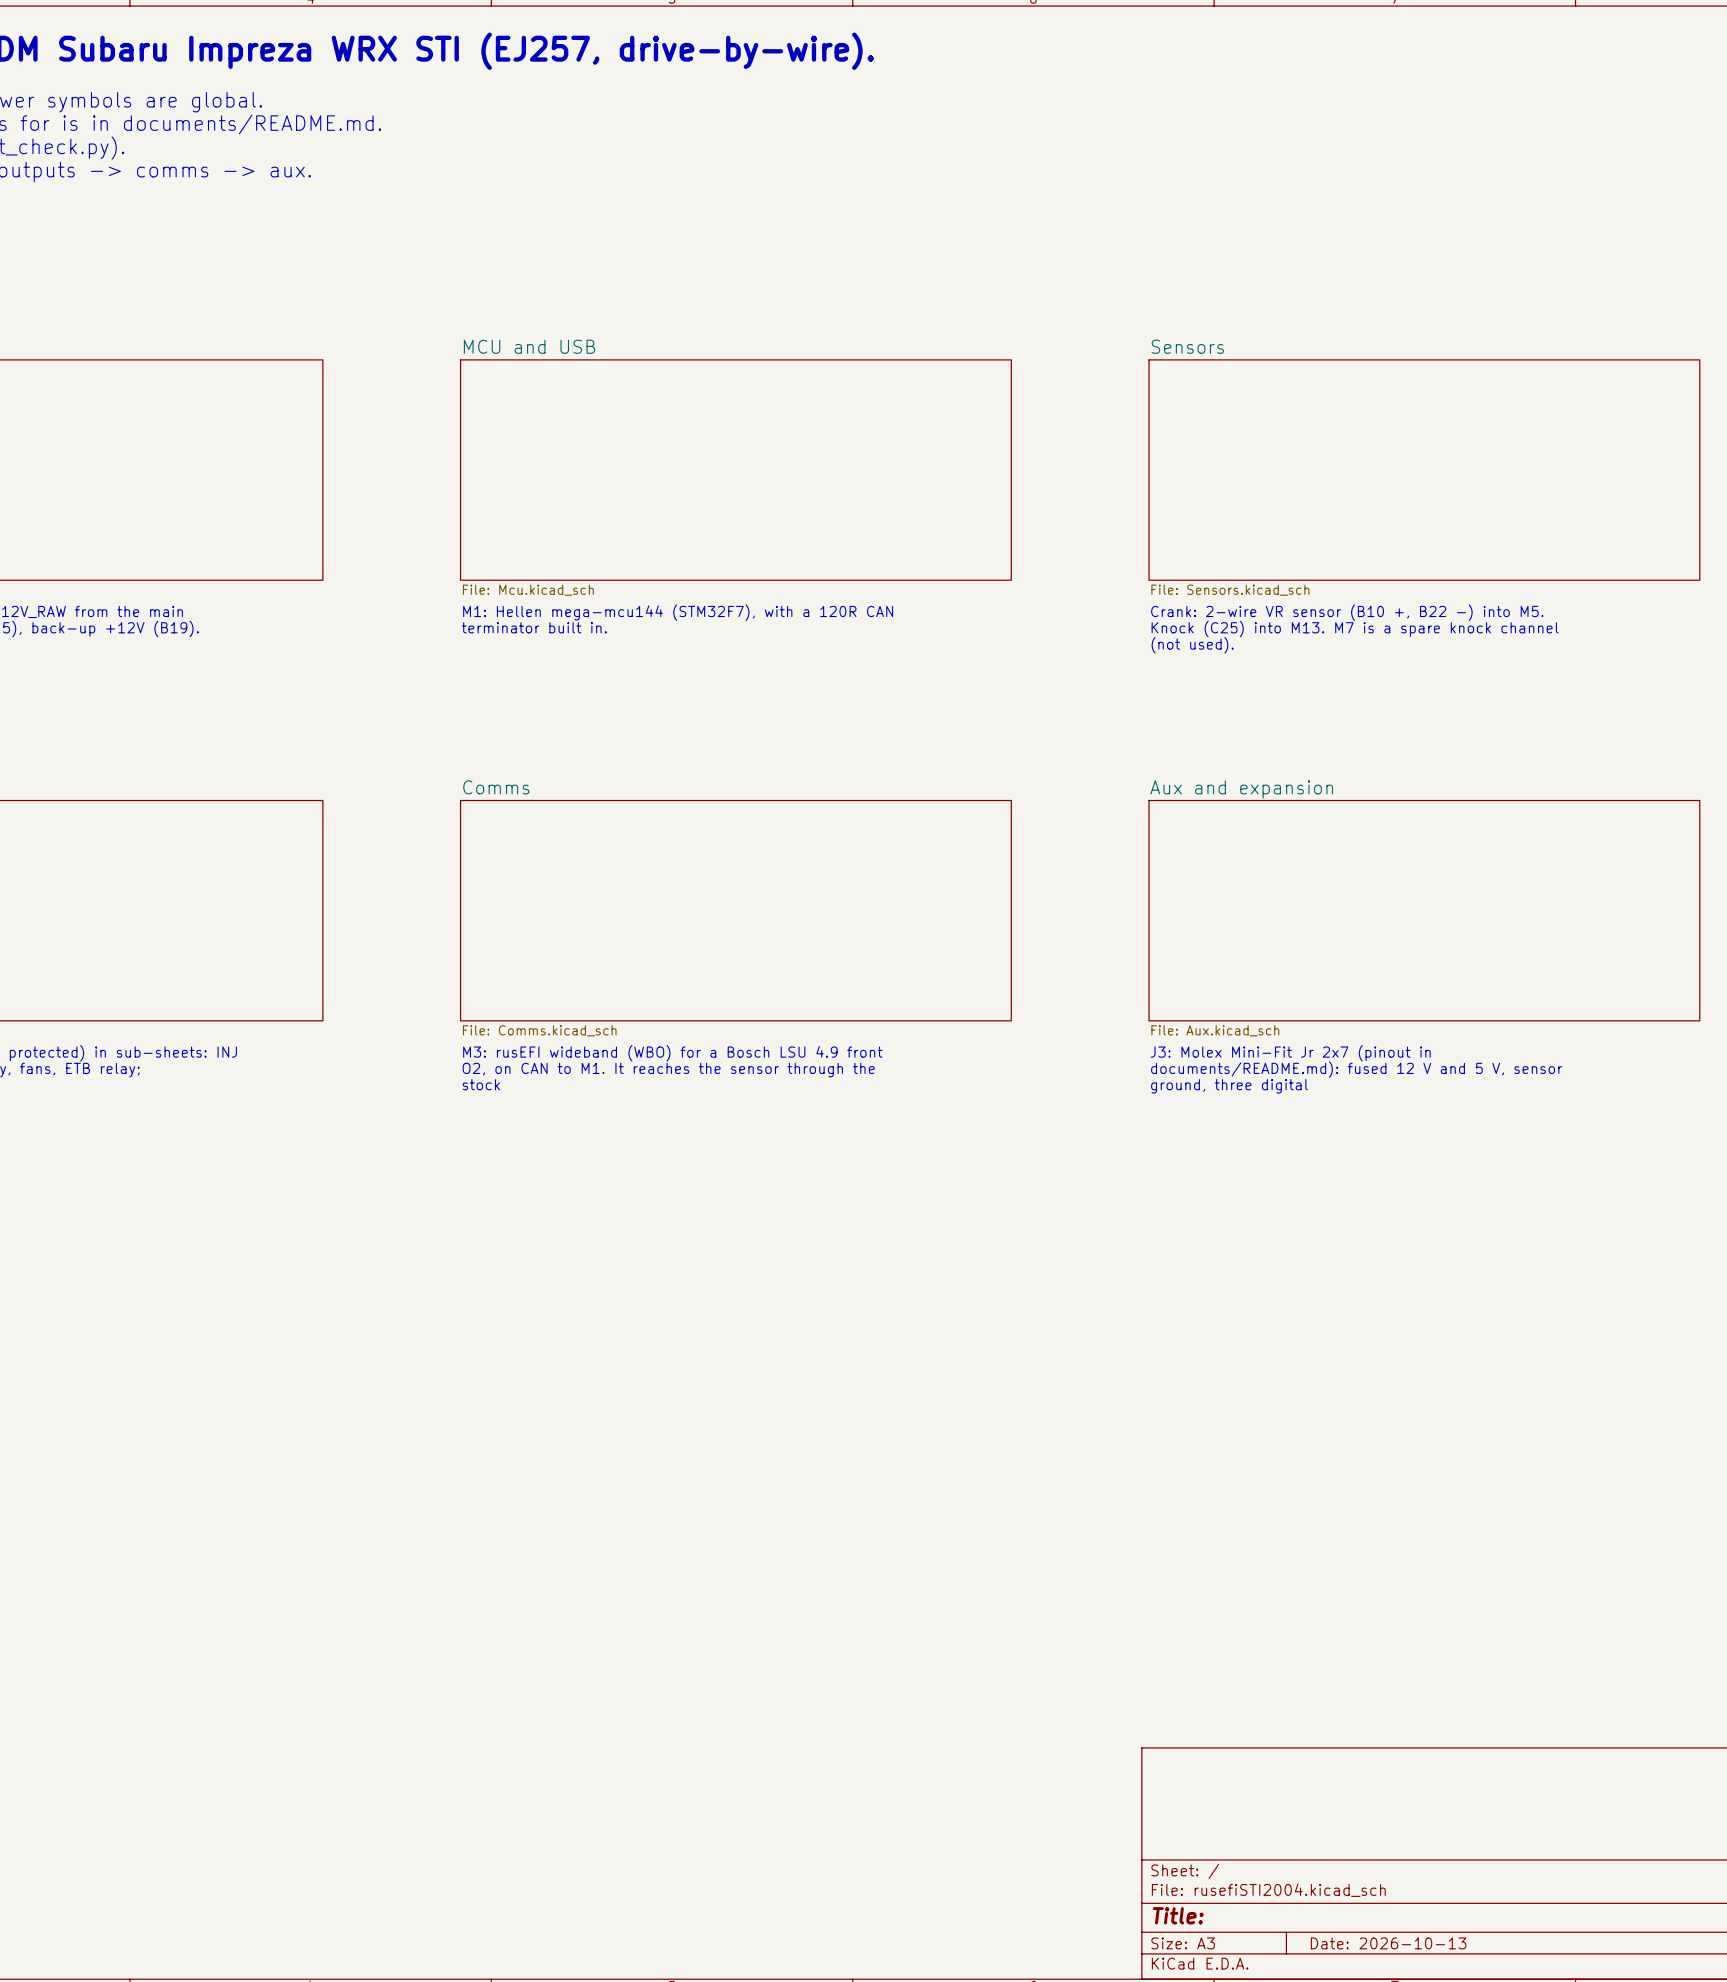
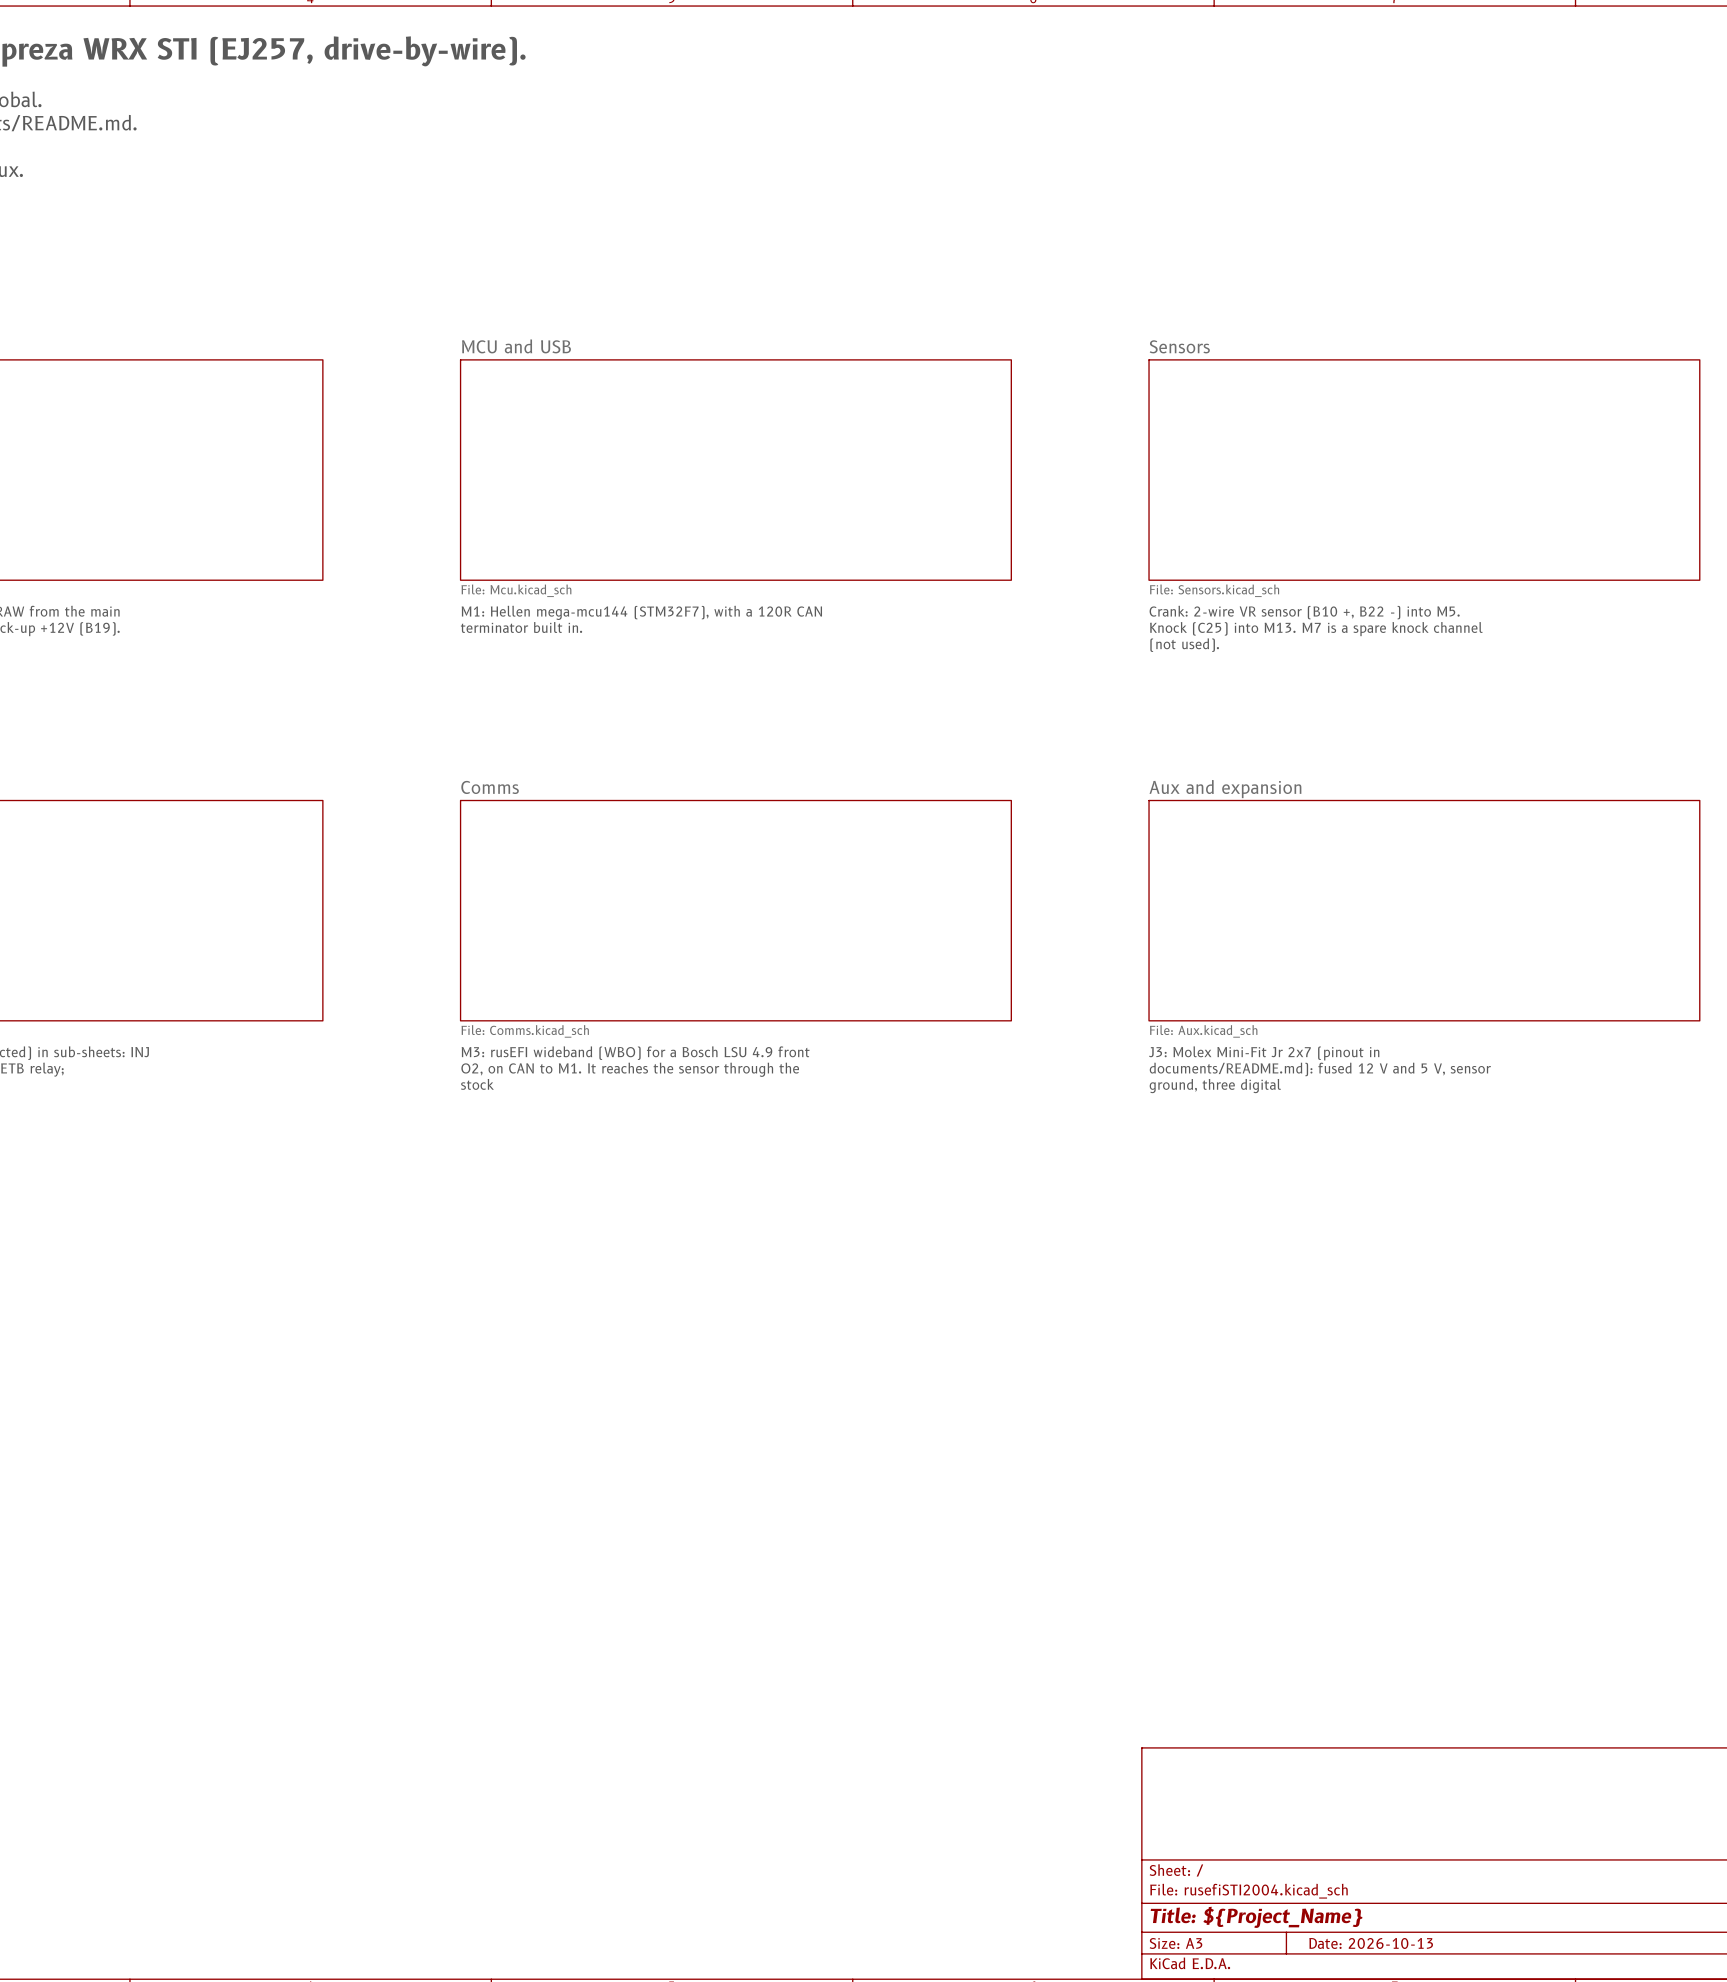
title block: Title: (1178, 1915) -> Title: ${Project_Name} (1256, 1917)

